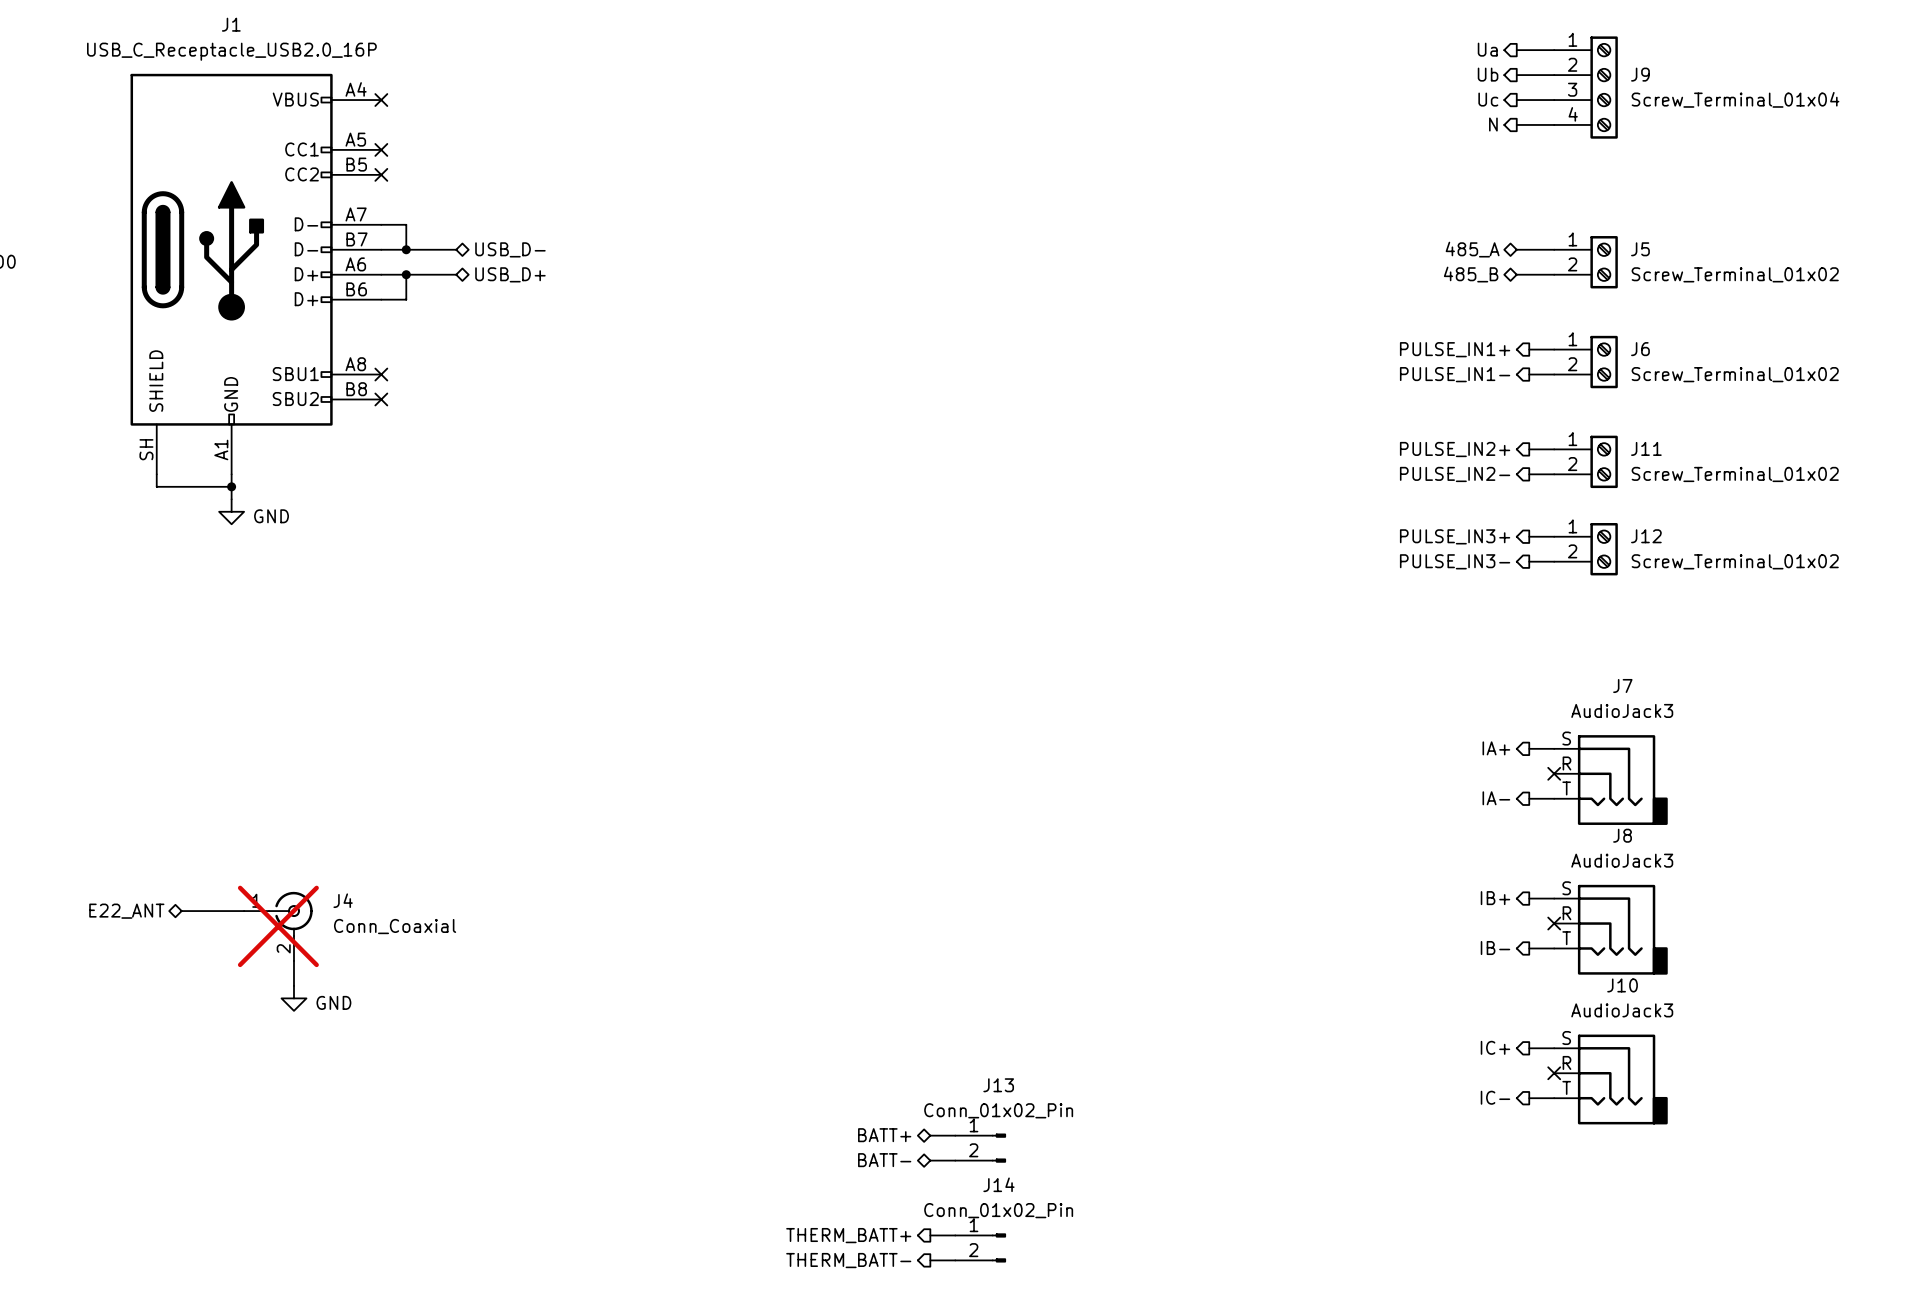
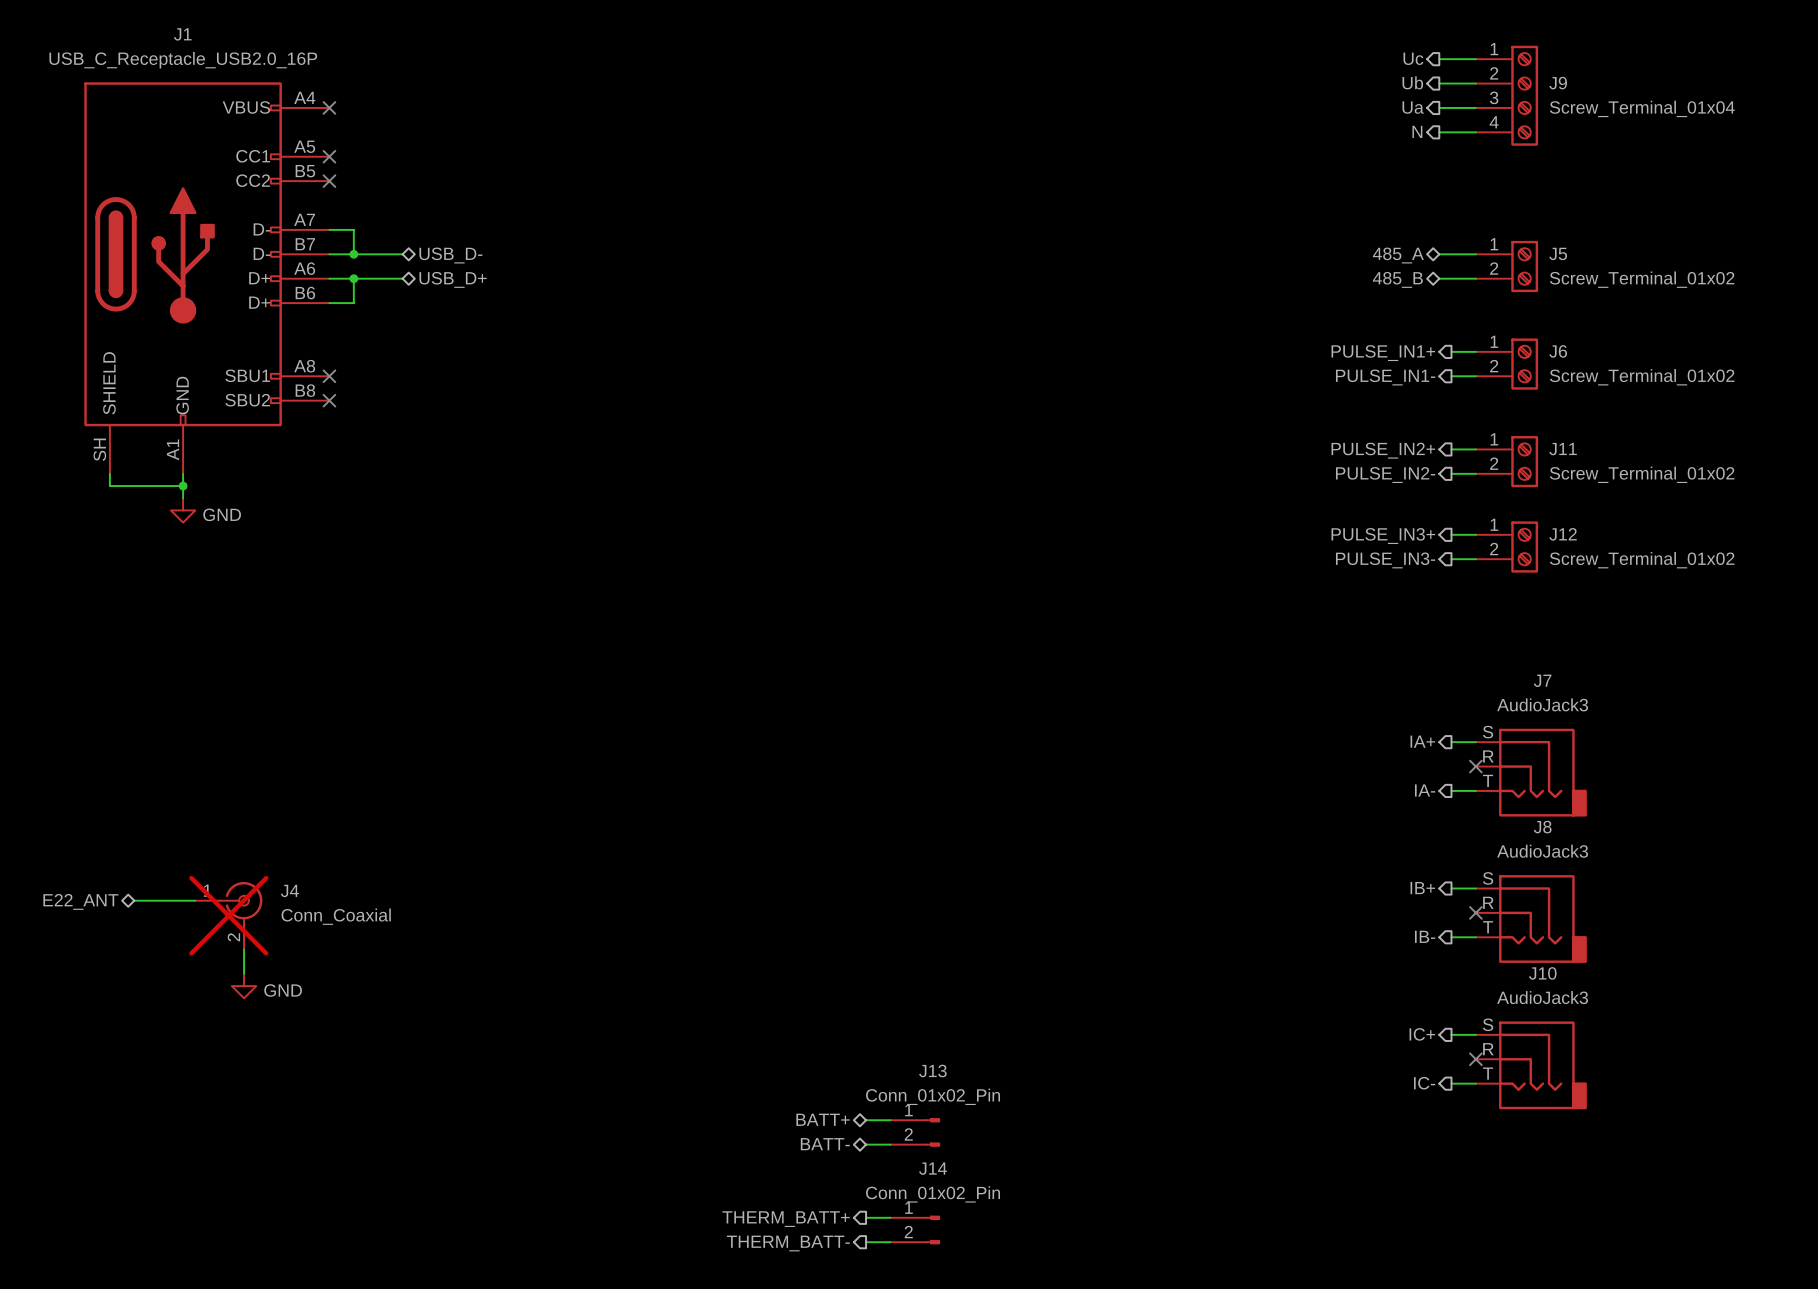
hierarchical label: Ua (1487, 49) -> Uc (1413, 58)
hierarchical label: Uc (1488, 99) -> Ua (1413, 107)

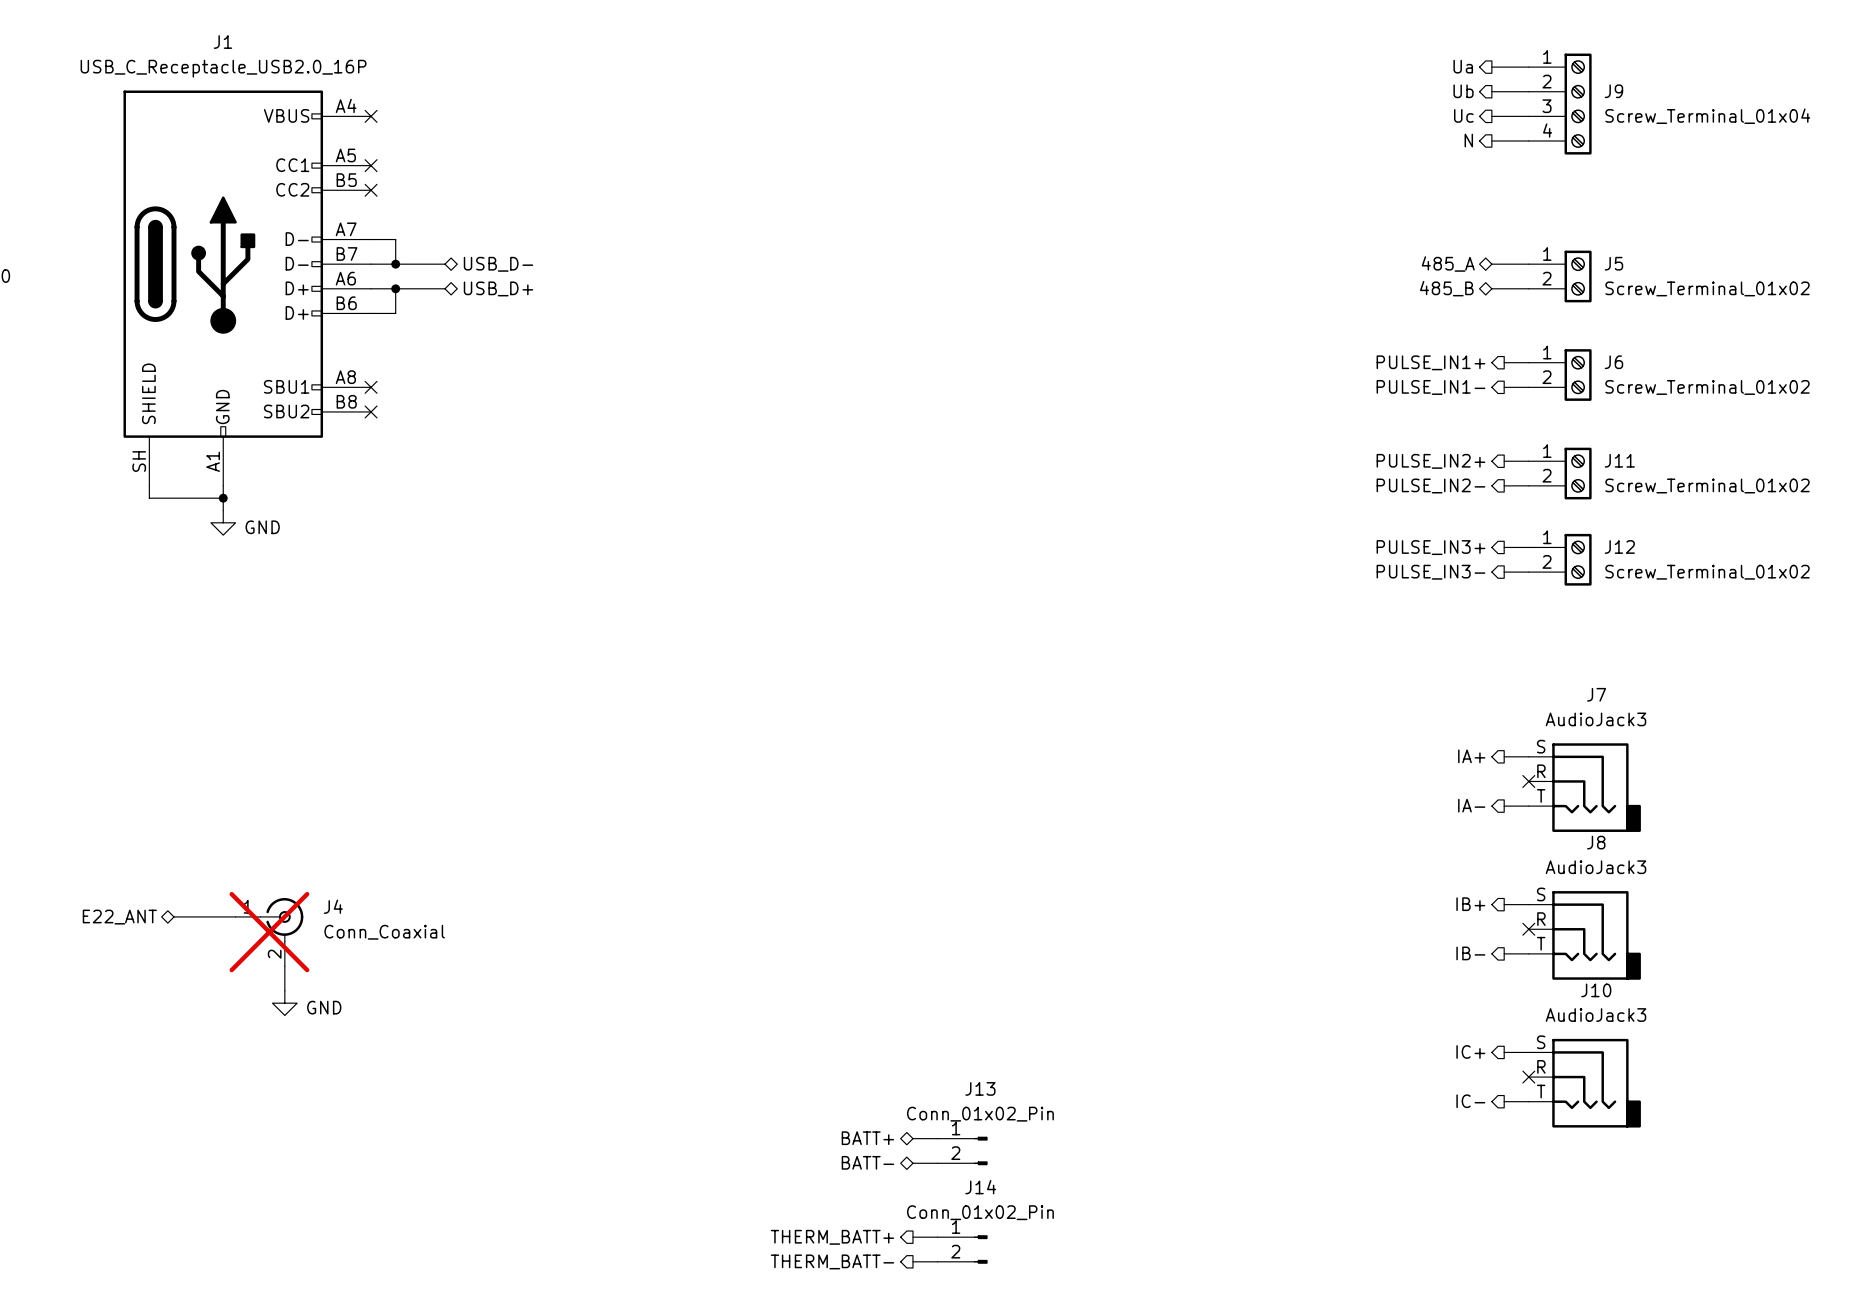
hierarchical label: Uc (1413, 58) -> Ua (1463, 66)
hierarchical label: Ua (1413, 107) -> Uc (1463, 115)

